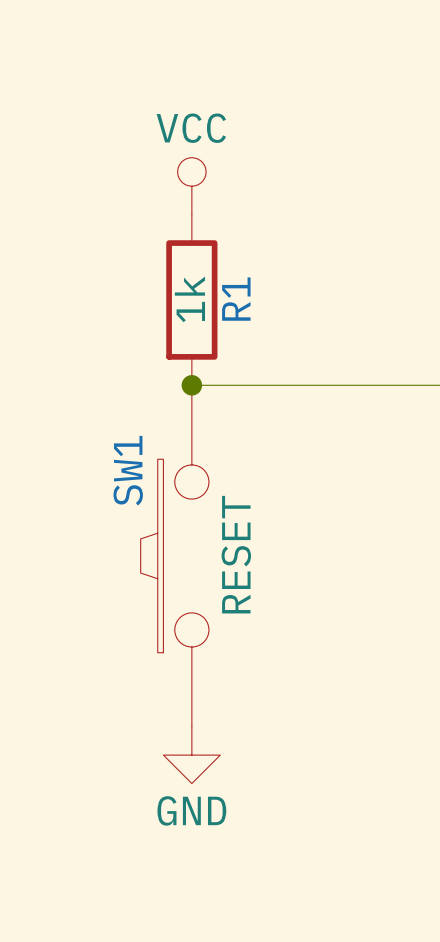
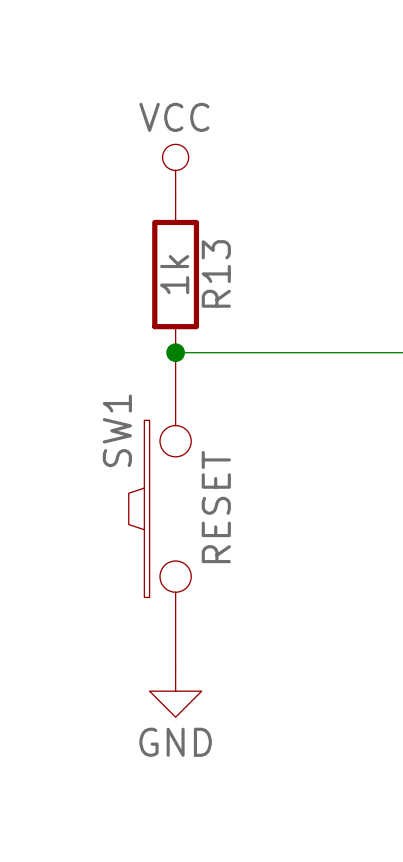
R1 name: R1 (236, 299) -> R13 (216, 273)

